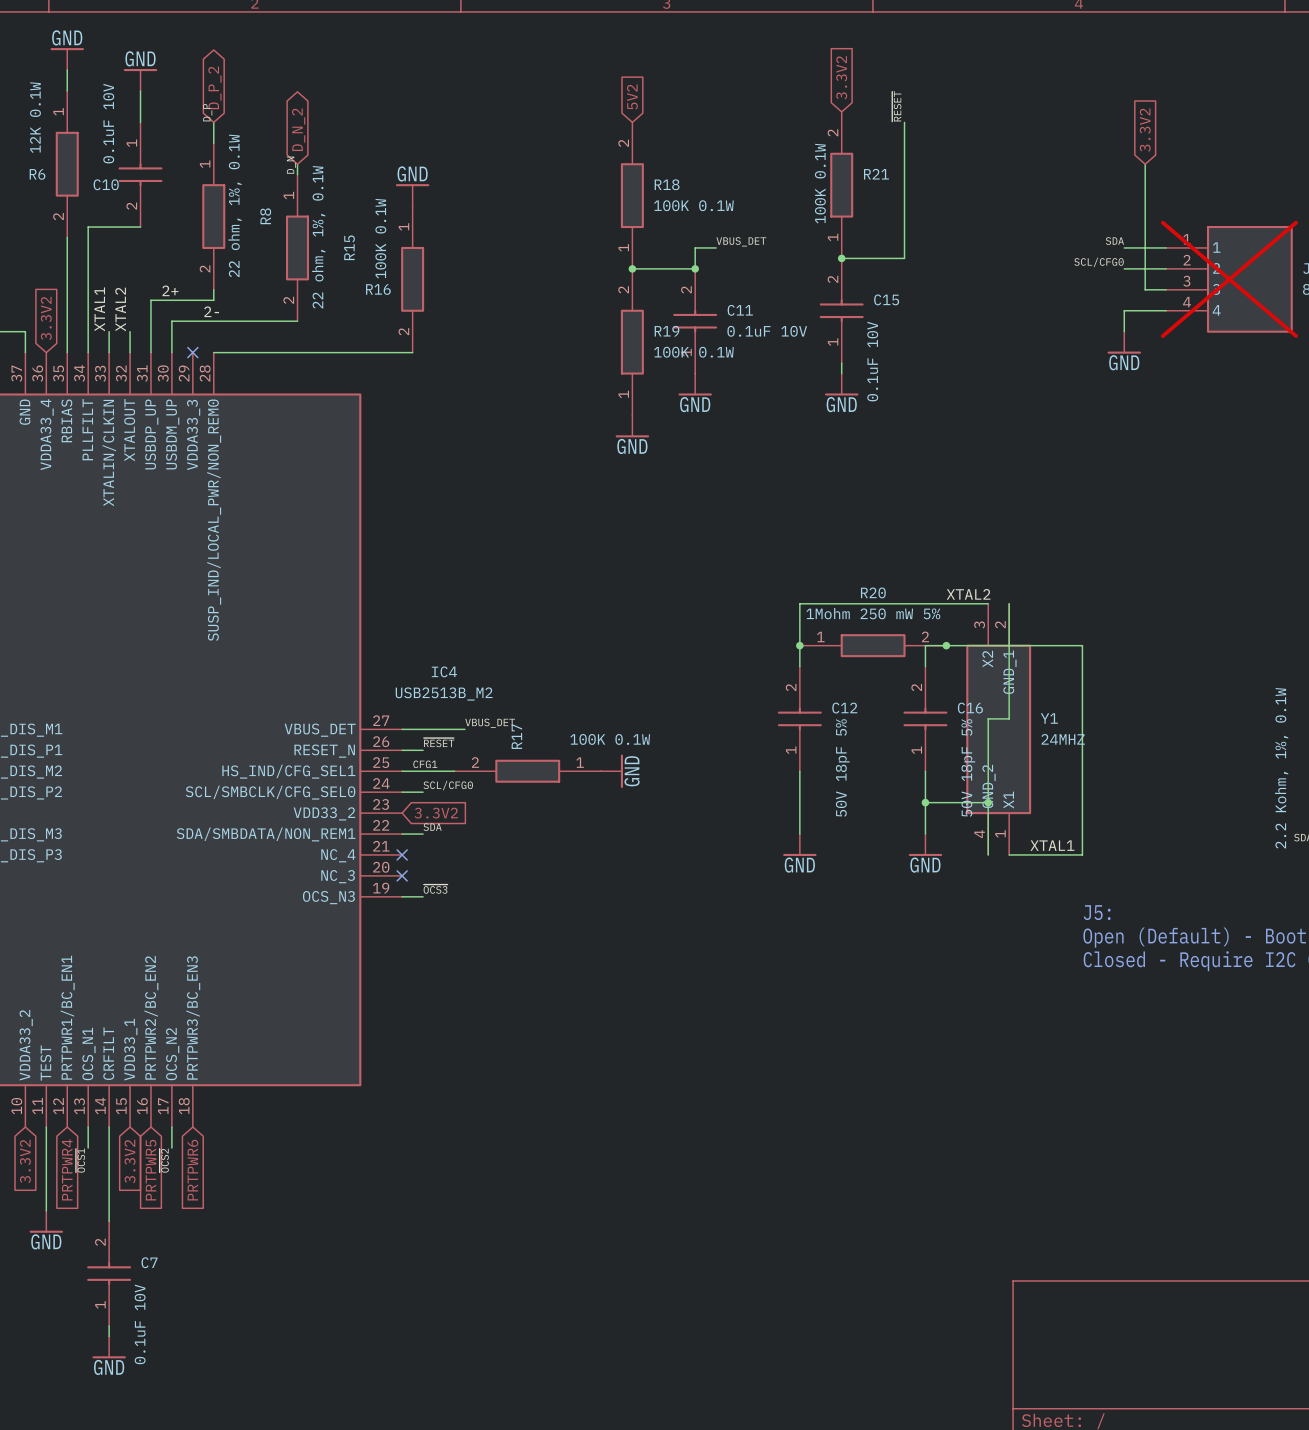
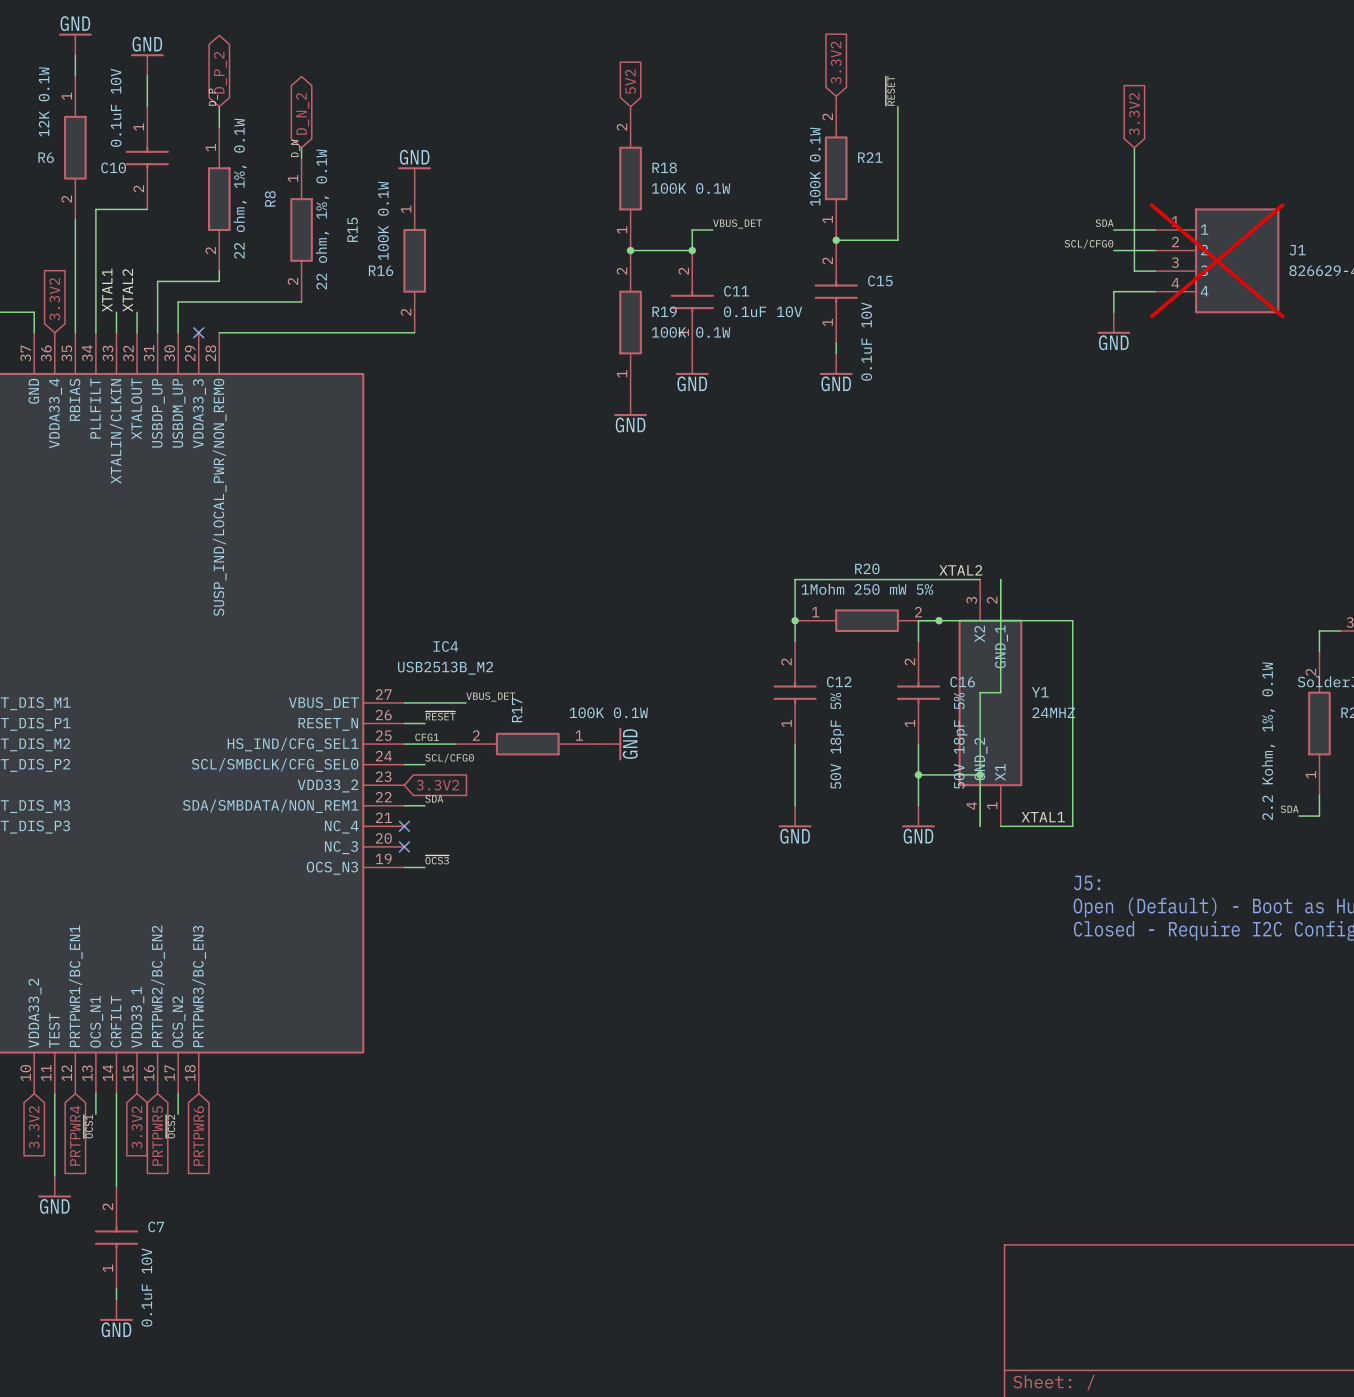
label: 2+ (170, 290) -> none
label: 2- (211, 311) -> none

